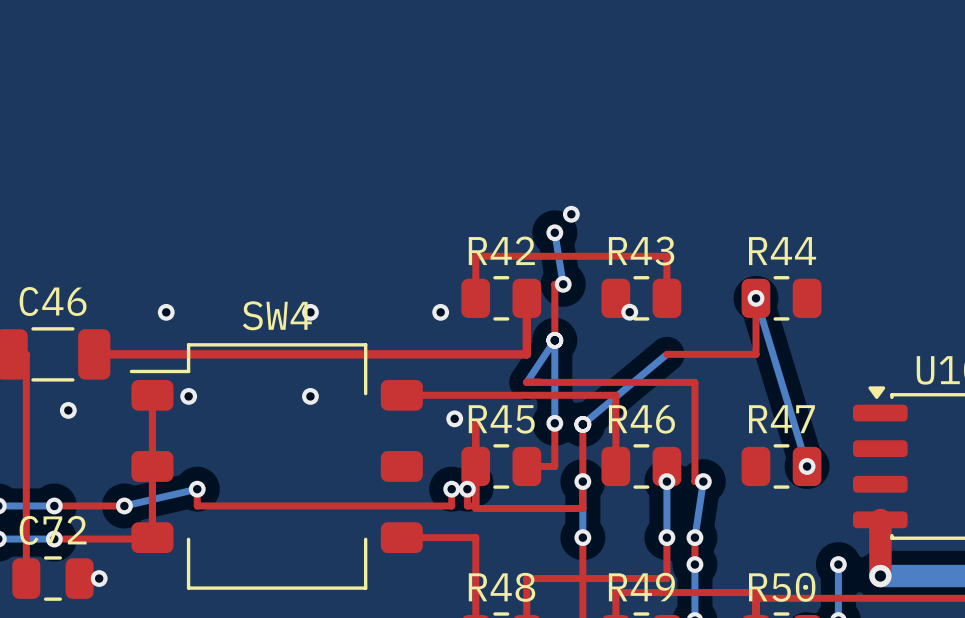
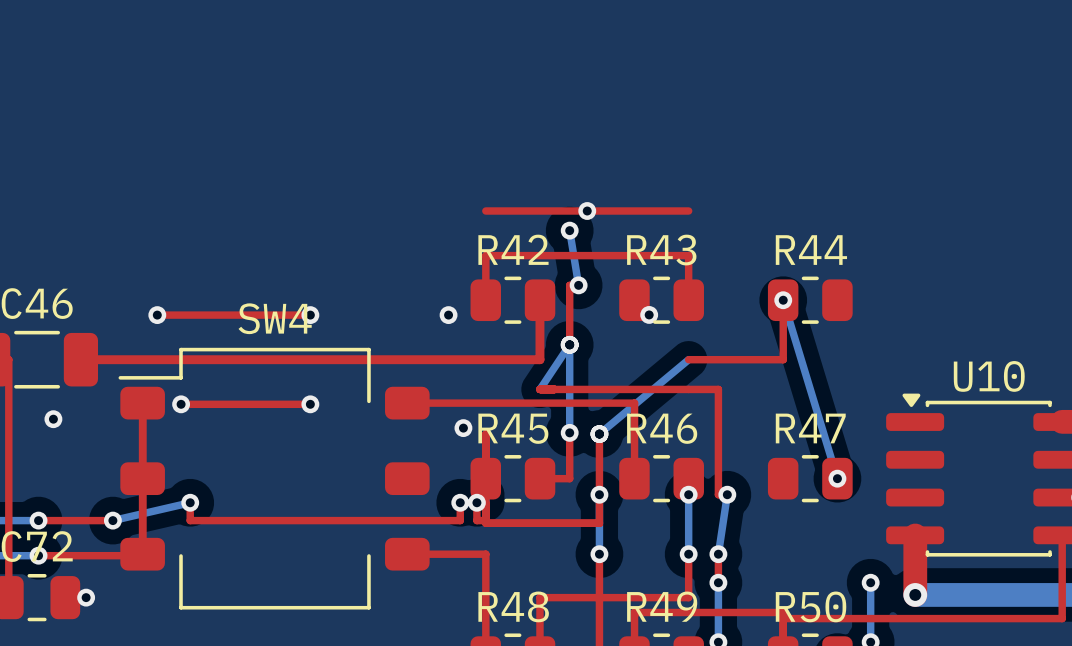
top track: none -> (485, 211) (688, 211)
top track: none -> (157, 315) (310, 315)
top track: none -> (181, 404) (310, 404)

